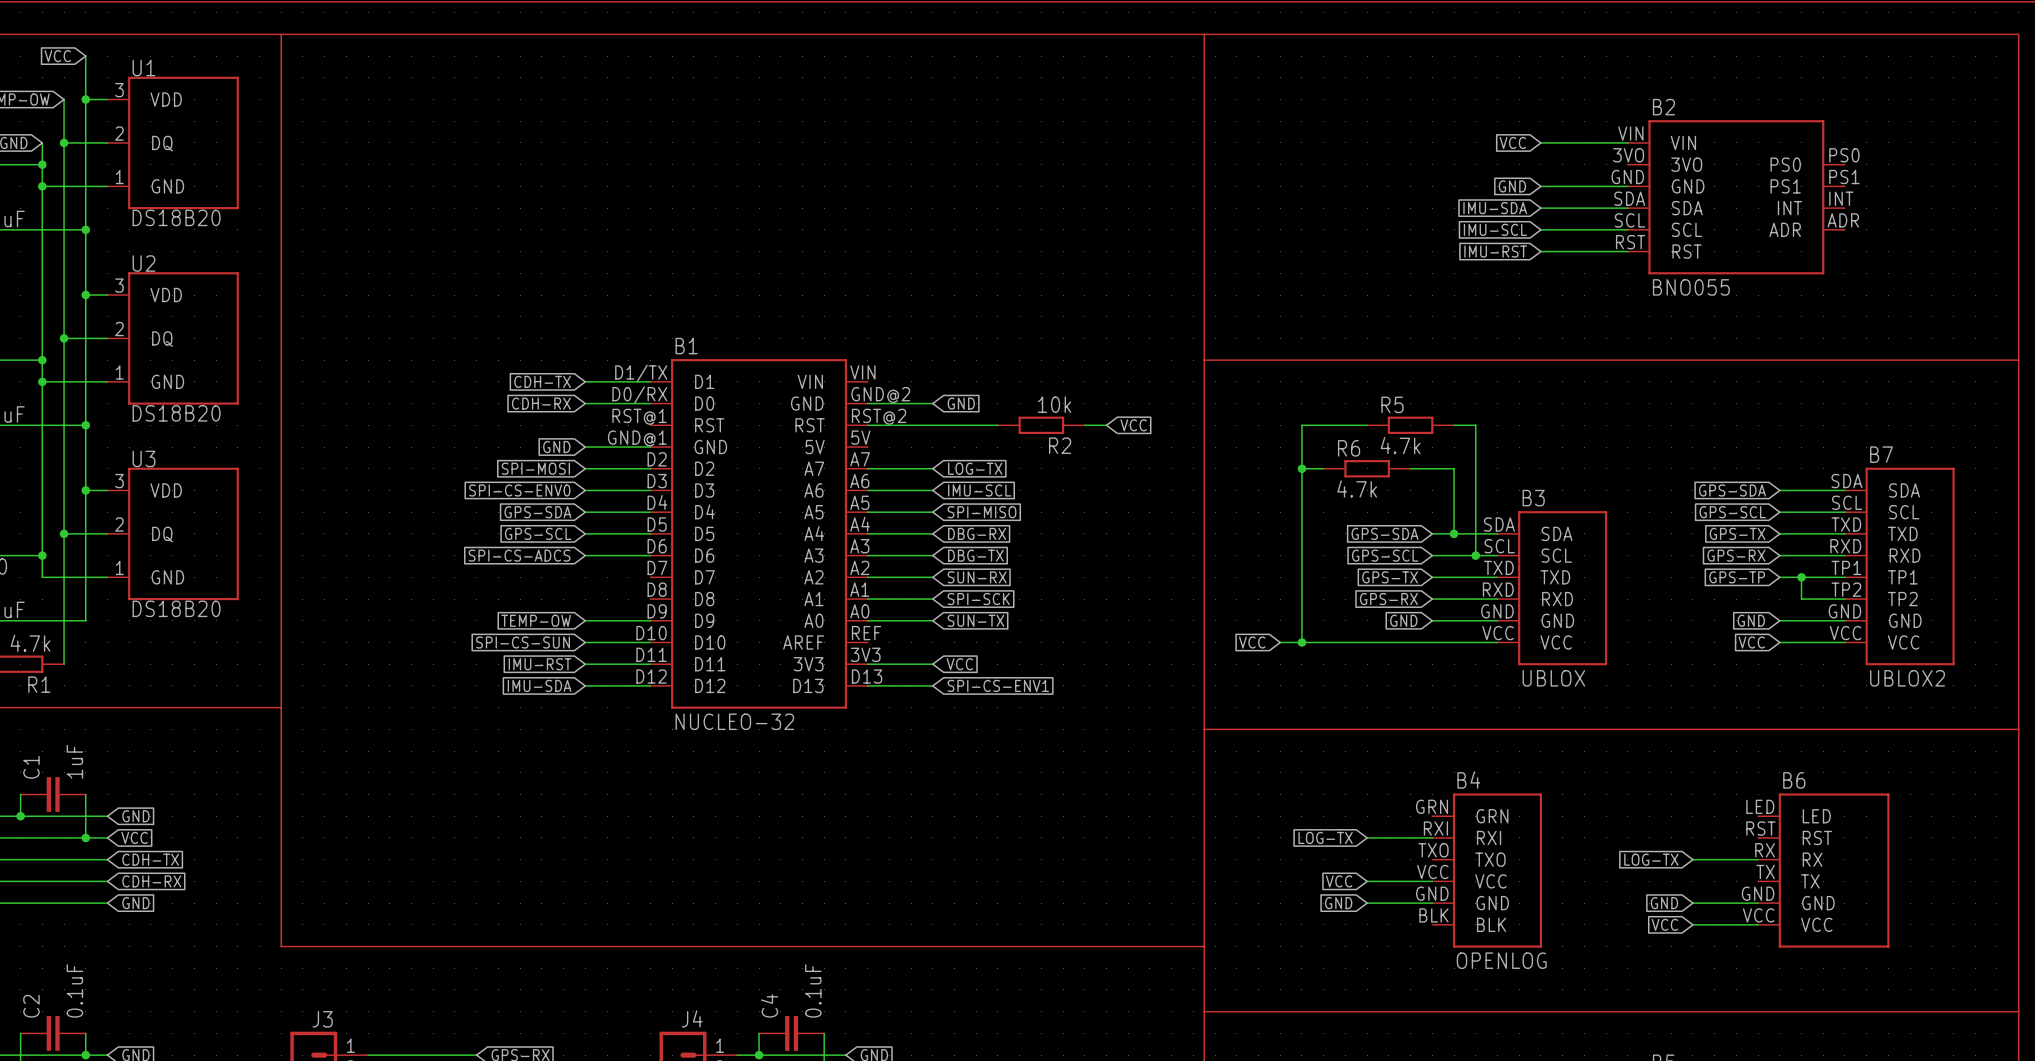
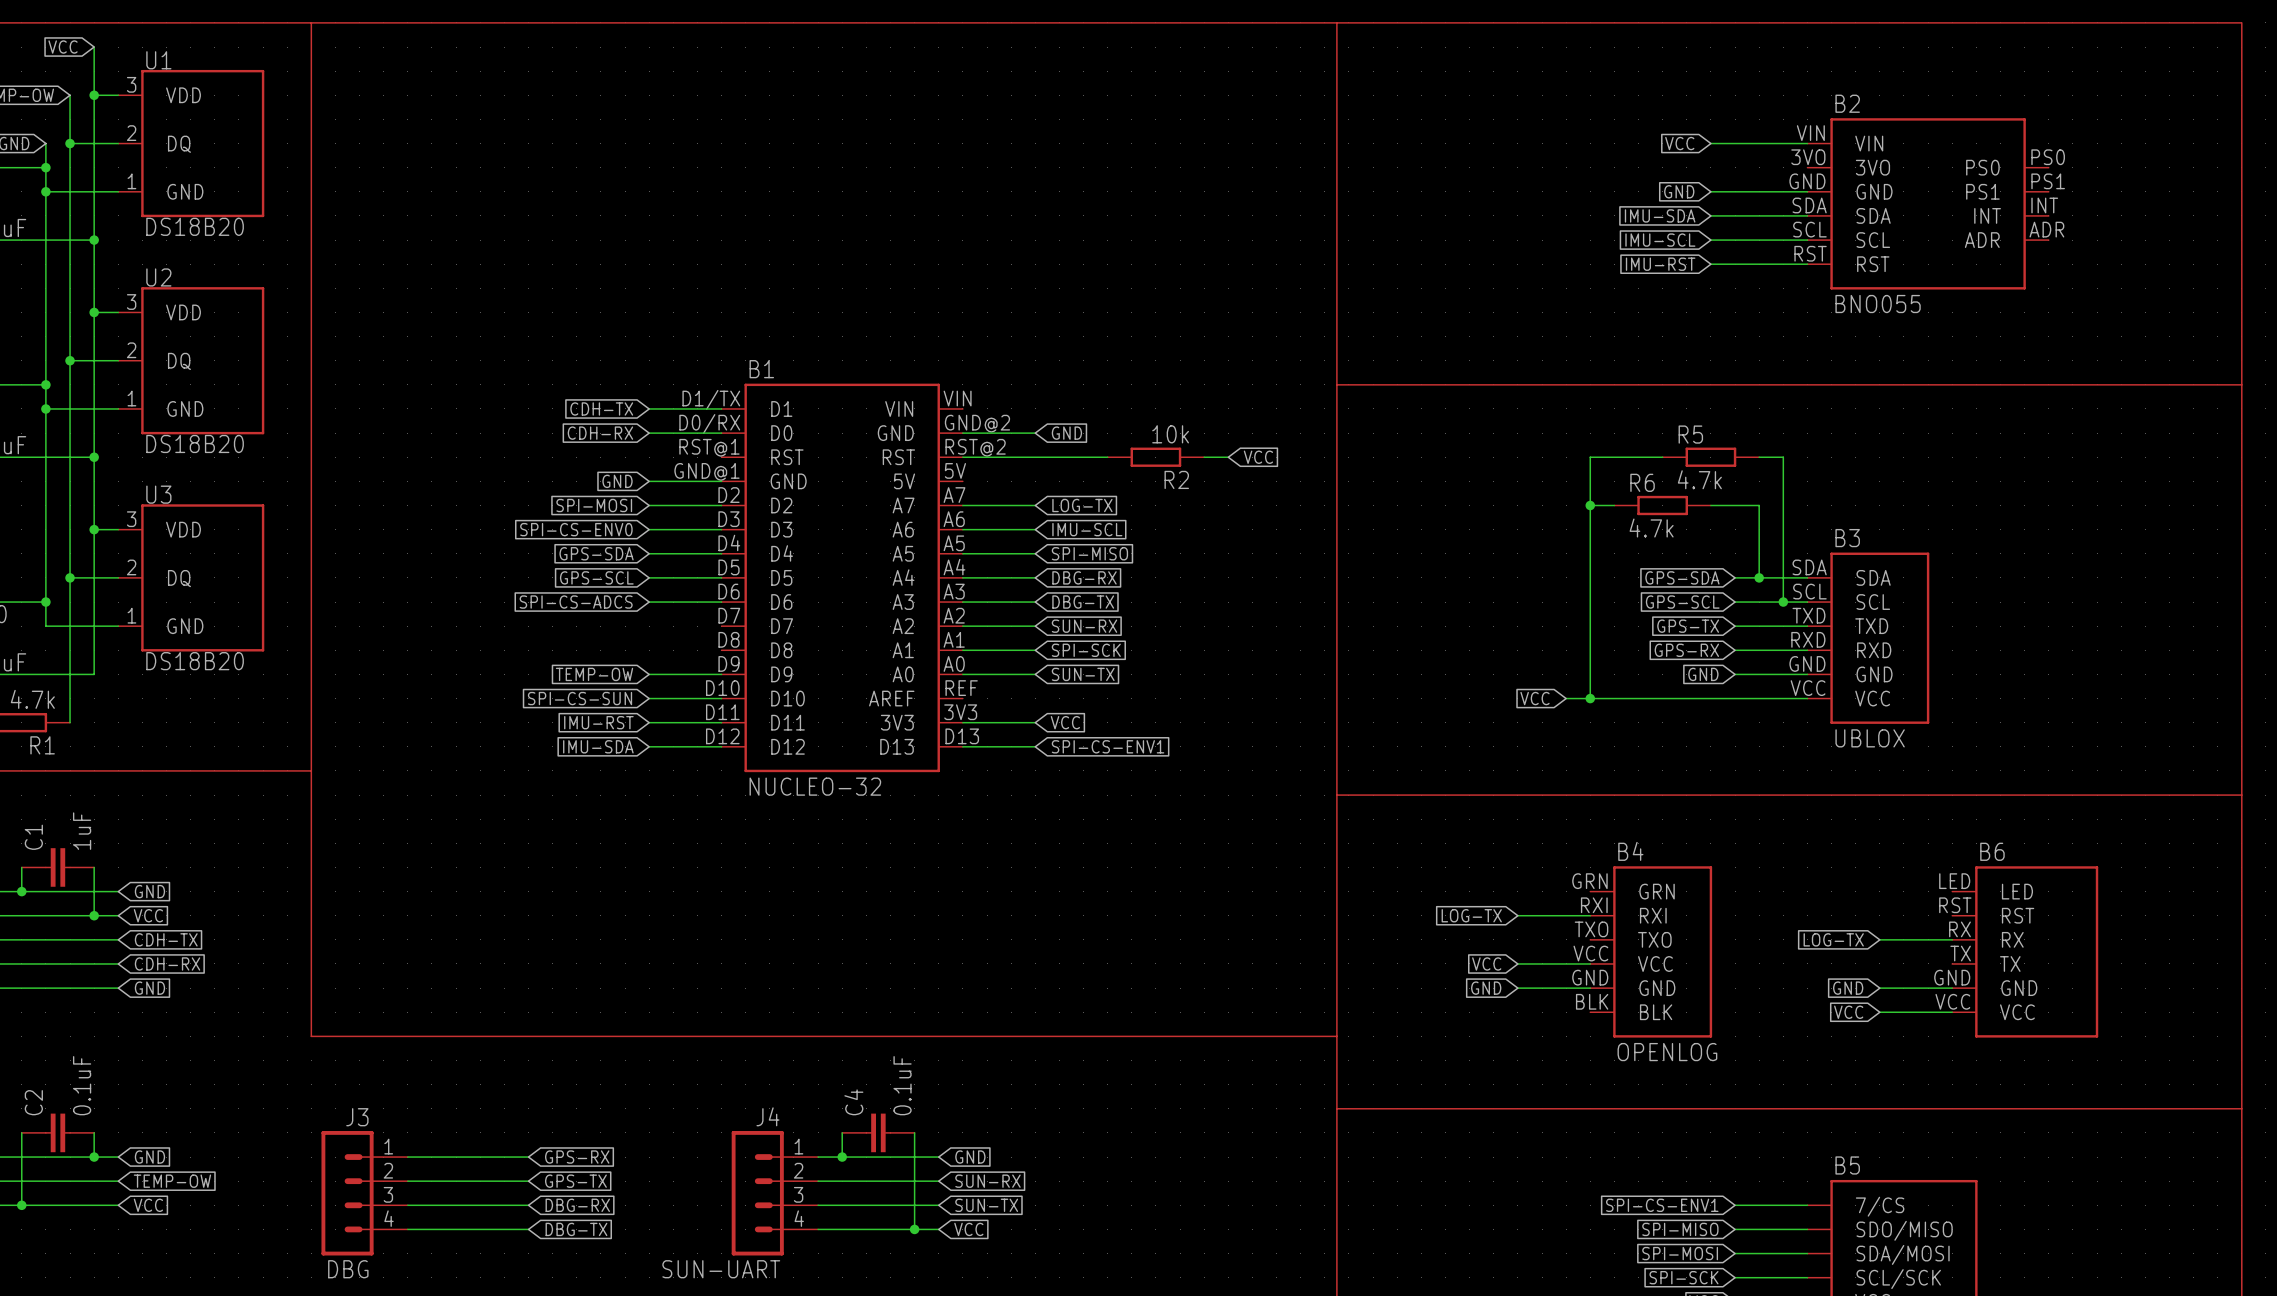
wire: (1367, 425) (1301, 425) (1301, 642) -> none
R5 position: (1410, 425) -> (1710, 457)
wire: none -> (1614, 457) (1590, 457) (1590, 698)
wire: (1475, 425) (1475, 555) -> (1638, 457) (1662, 457)
wire: none -> (1759, 457) (1783, 457) (1783, 602)
wire: (1301, 468) (1323, 468) -> none
junction: (1301, 468) -> none
R6 position: (1367, 468) -> (1662, 505)
wire: (1410, 468) (1432, 468) -> none
junction: none -> (1590, 505)
wire: (1454, 468) (1454, 533) -> none
wire: none -> (1710, 505) (1759, 505) (1759, 577)
global label: GPS-SDA (1732, 490) -> none
wire: (1779, 490) (1844, 490) -> none
global label: GPS-SCL (1732, 512) -> none
wire: (1779, 512) (1844, 512) -> none
global label: GPS-SDA (1384, 533) -> none
wire: (1432, 533) (1497, 533) -> (1735, 577) (1807, 577)
junction: (1454, 533) -> none
global label: none -> GPS-SDA (1682, 577)
junction: none -> (1759, 577)
global label: GPS-TX (1737, 533) -> none
wire: (1779, 533) (1844, 533) -> none
global label: GPS-SCL (1385, 555) -> none
wire: (1432, 555) (1497, 555) -> (1735, 602) (1807, 602)
junction: (1475, 555) -> none
global label: none -> GPS-SCL (1682, 602)
junction: none -> (1783, 602)
global label: GPS-RX (1736, 555) -> none
wire: (1779, 555) (1844, 555) -> none
B7: UBLOX2 (1899, 566) -> none
global label: GPS-TX (1390, 577) -> none
wire: (1432, 577) (1497, 577) -> (1735, 626) (1807, 626)
global label: none -> GPS-TX (1688, 626)
global label: GPS-TP (1737, 577) -> none
wire: (1779, 577) (1844, 577) -> none
wire: (1801, 577) (1801, 599) (1844, 599) -> none
junction: (1801, 577) -> none
B3 position: (1552, 588) -> (1868, 638)
global label: GPS-RX (1388, 599) -> none
wire: (1432, 599) (1497, 599) -> (1735, 650) (1807, 650)
global label: none -> GPS-RX (1686, 650)
global label: GND (1403, 620) -> none
wire: (1432, 620) (1497, 620) -> (1735, 674) (1807, 674)
global label: none -> GND (1703, 674)
global label: GND (1751, 620) -> none
wire: (1779, 620) (1844, 620) -> none
global label position: VCC (1252, 642) -> VCC (1534, 698)
wire: (1280, 642) (1410, 642) -> none
junction: (1301, 642) -> none
junction: none -> (1590, 698)
wire: none -> (1662, 698) (1807, 698)
global label: VCC (1751, 642) -> none
wire: (1779, 642) (1844, 642) -> none

